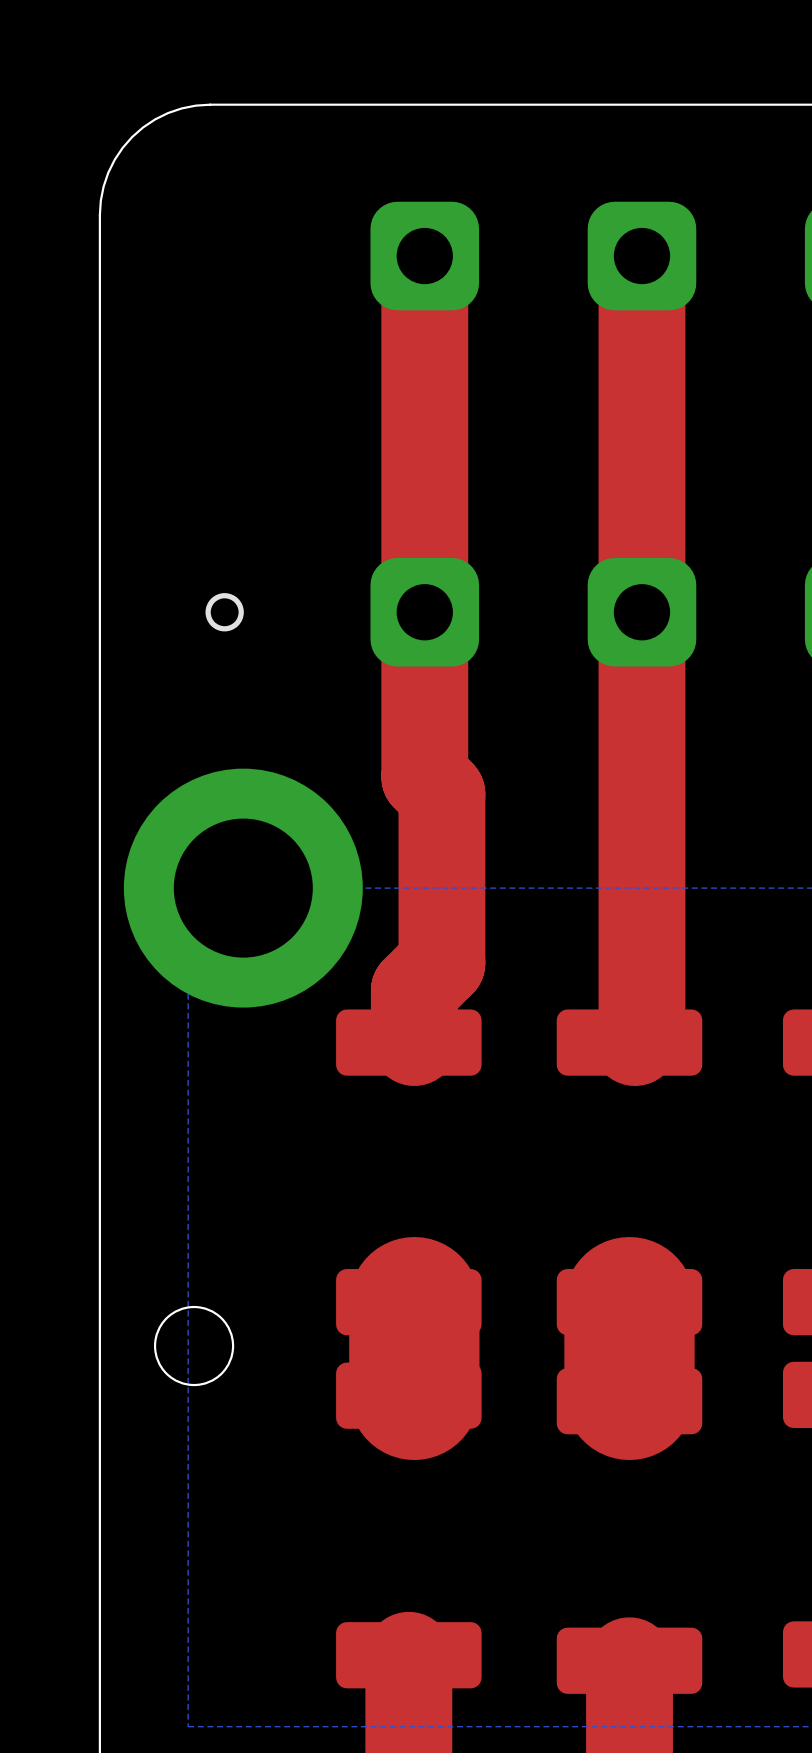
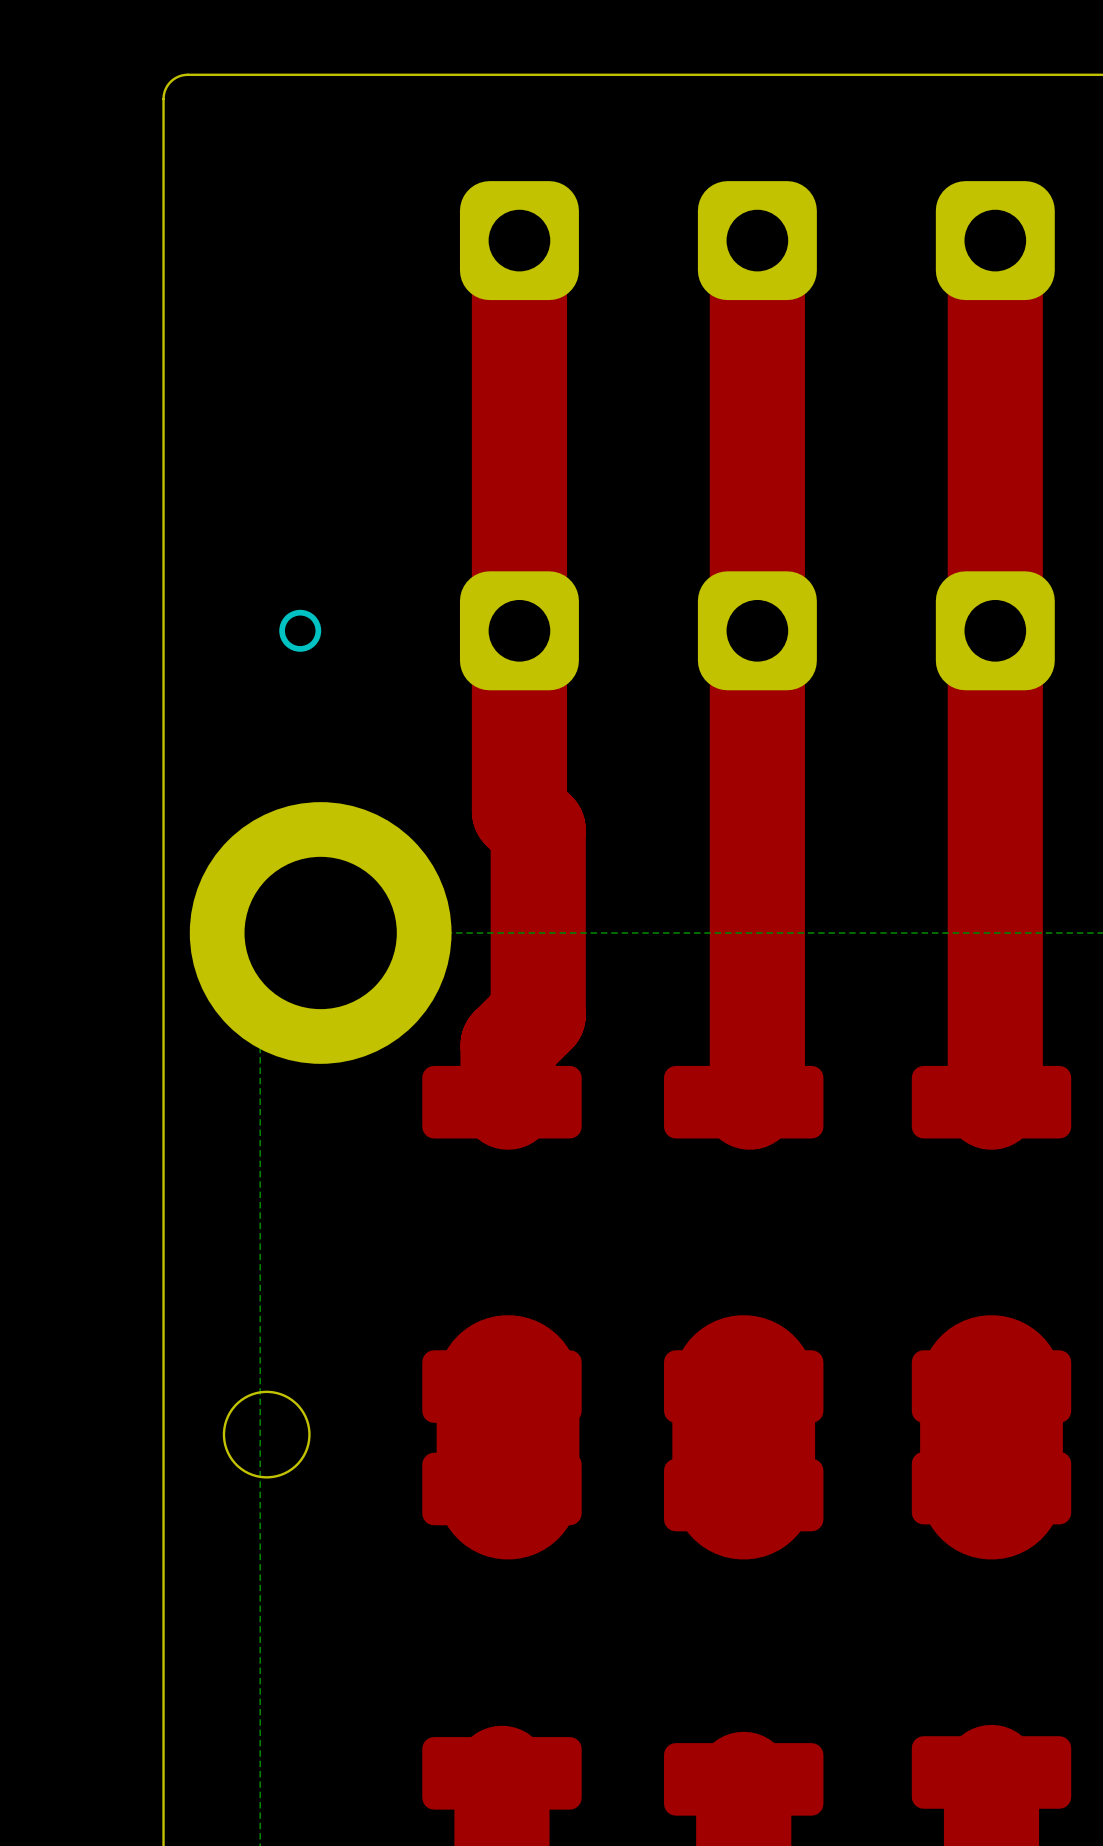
board edge: (210, 104) (181, 108) (168, 113) (155, 119) (132, 137) (114, 159) (108, 172) (100, 200) (99, 215) -> (284, 74) (187, 74) (178, 76) (170, 81) (165, 89) (163, 98) (163, 195)

